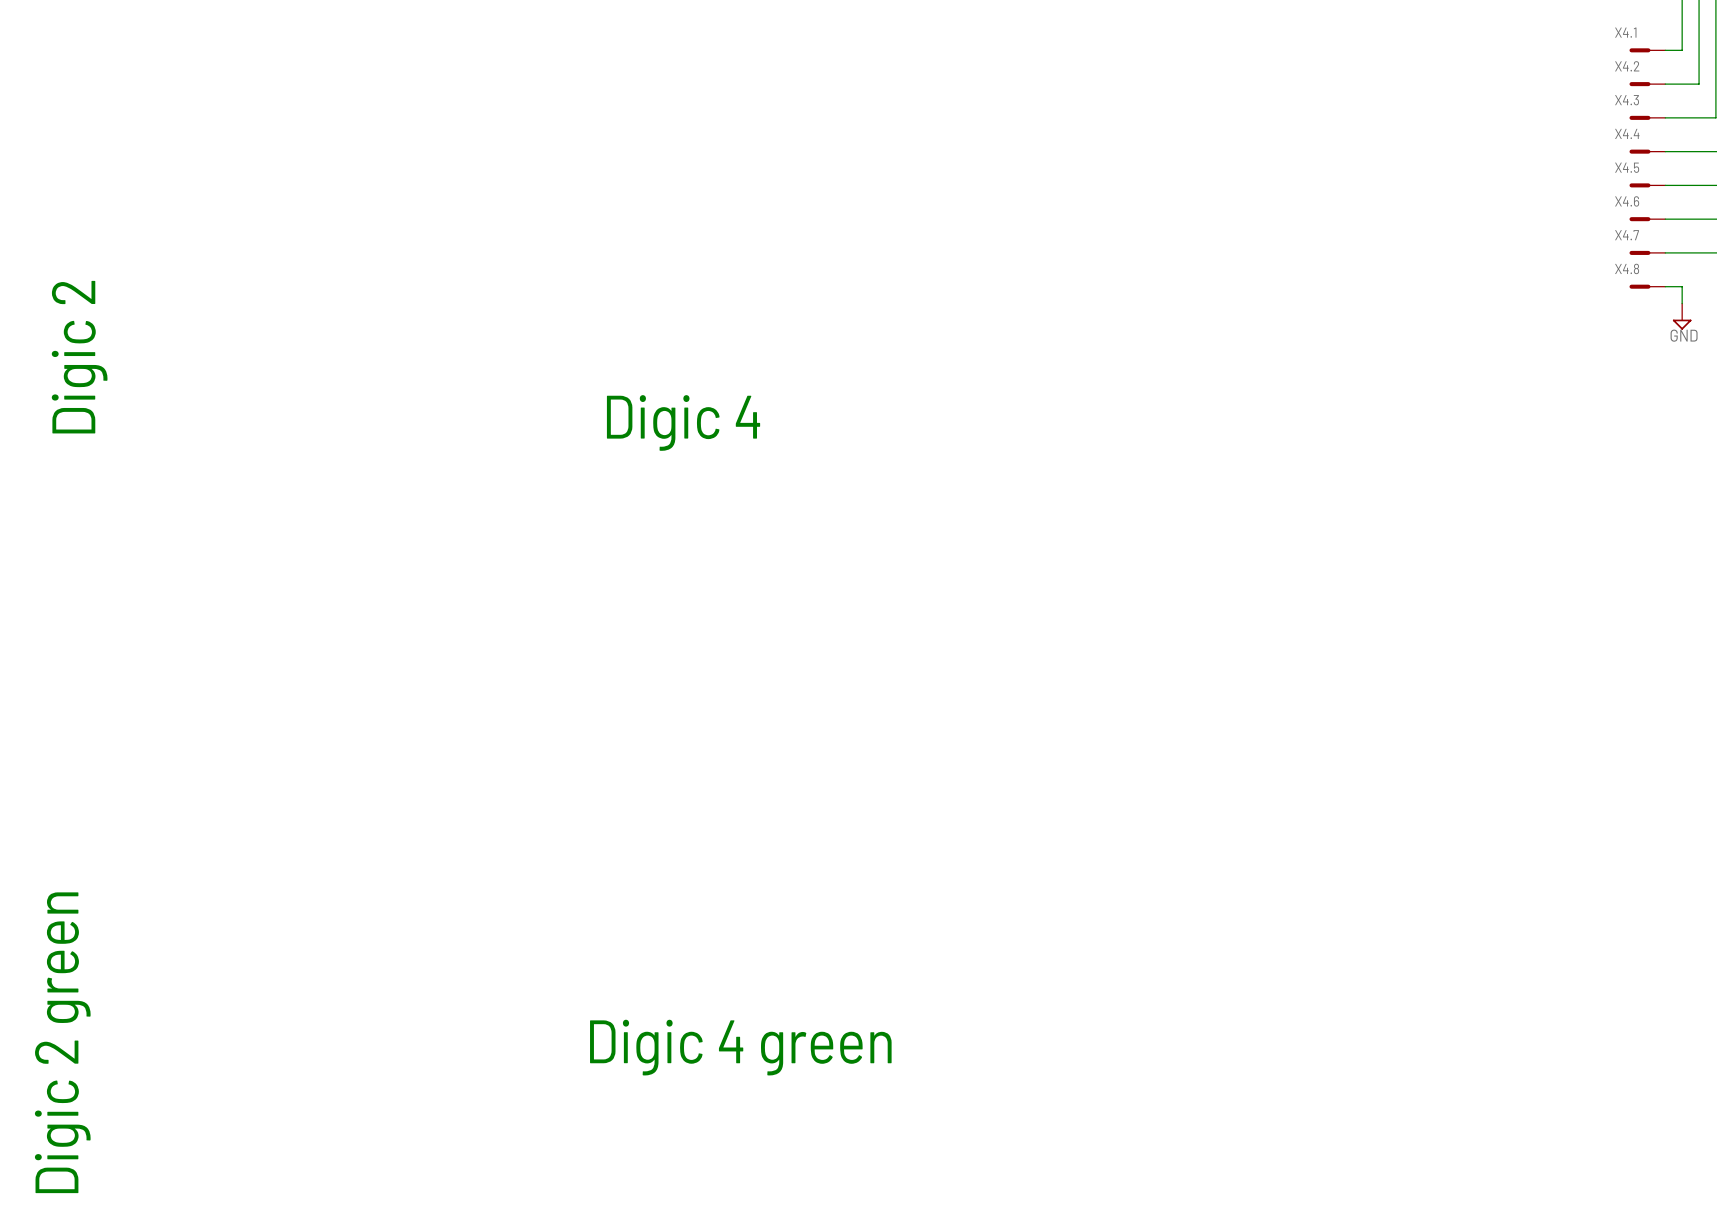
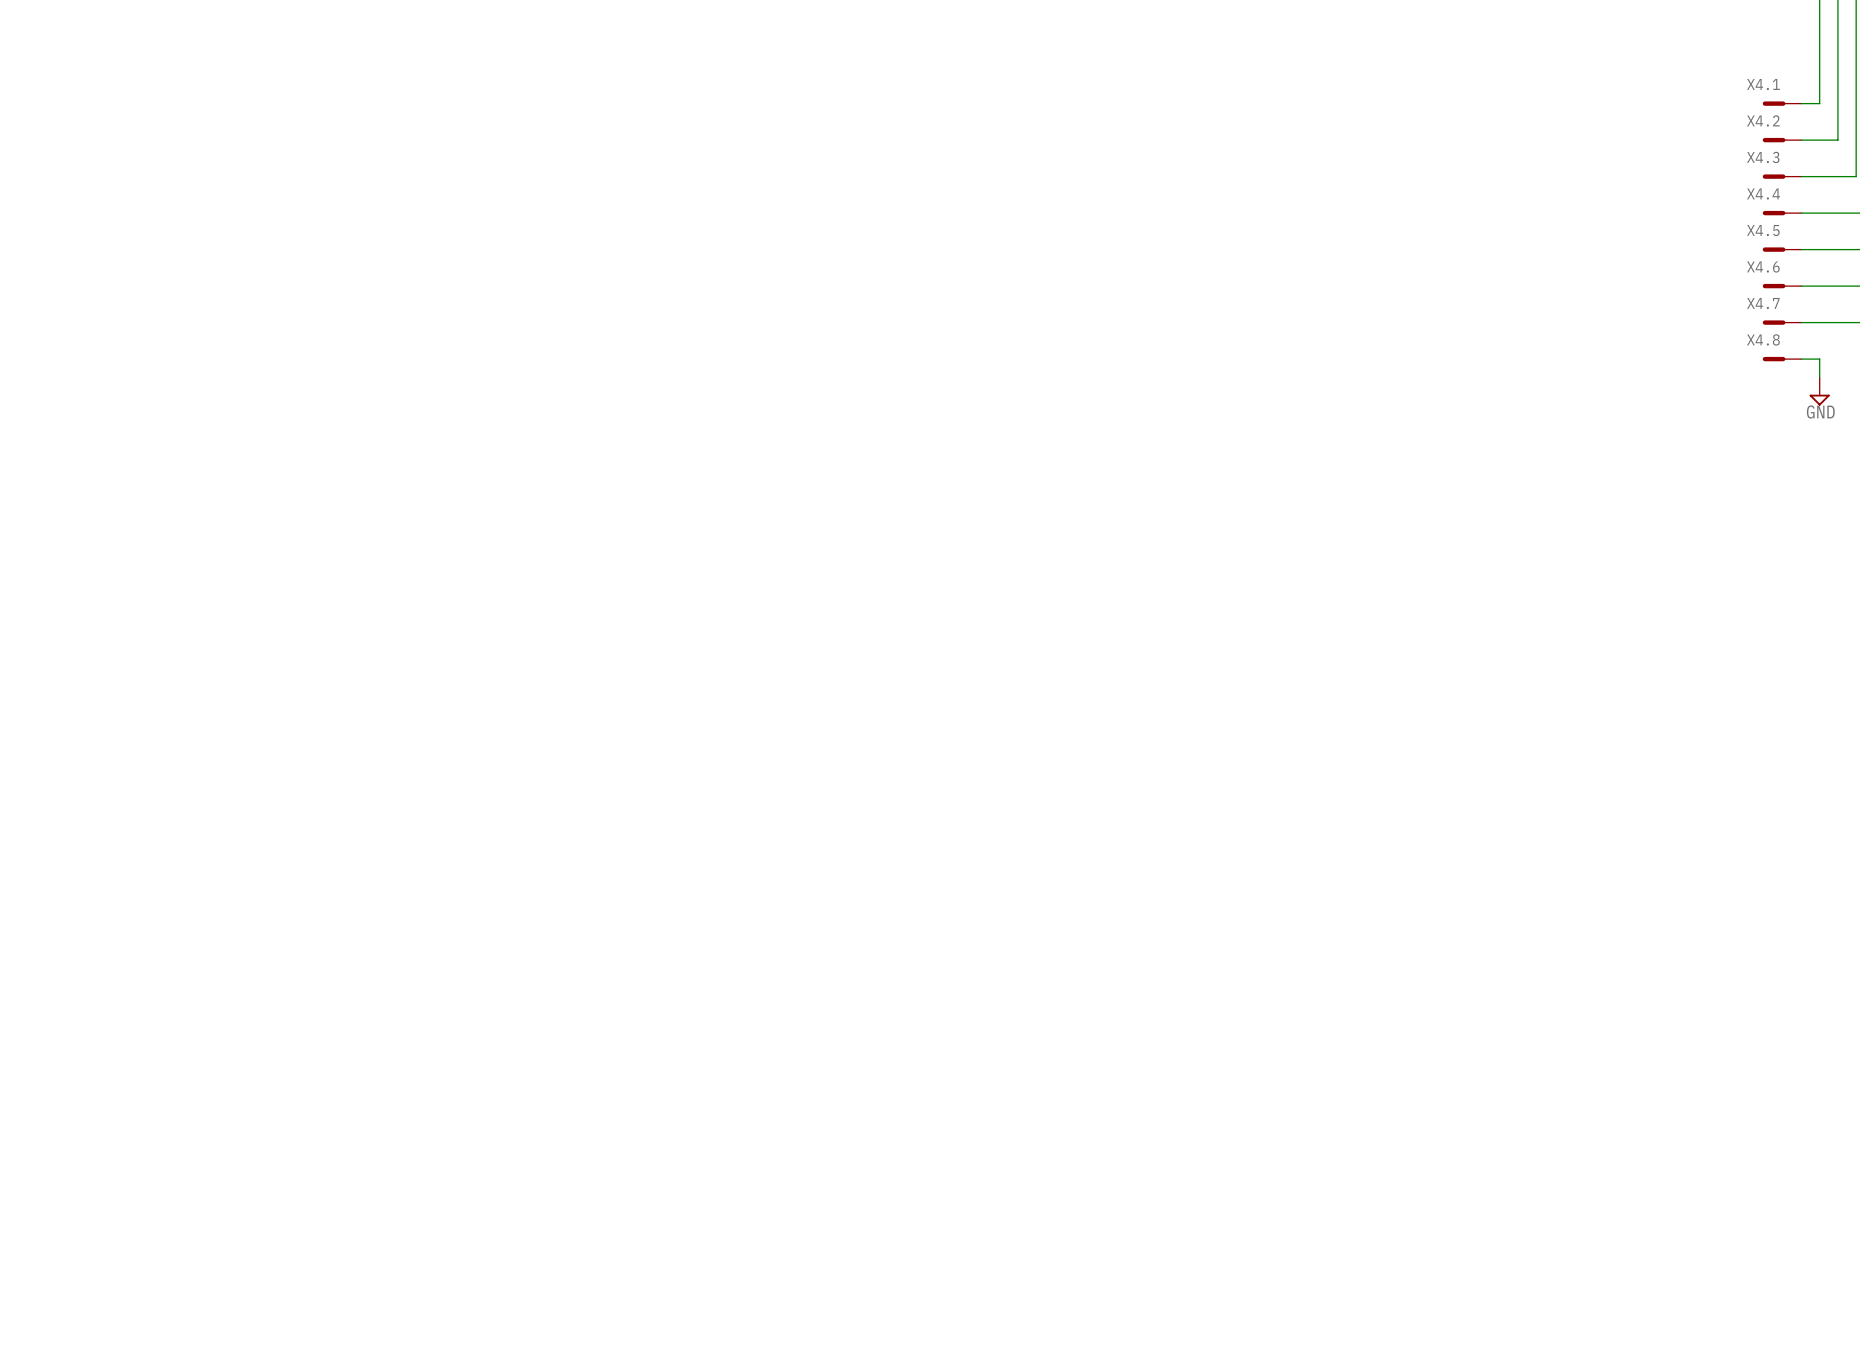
text: Digic 2 (79, 357) -> none
text: Digic 4 (683, 422) -> none
text: Digic 2 green (62, 1042) -> none
text: Digic 4 green (740, 1047) -> none

